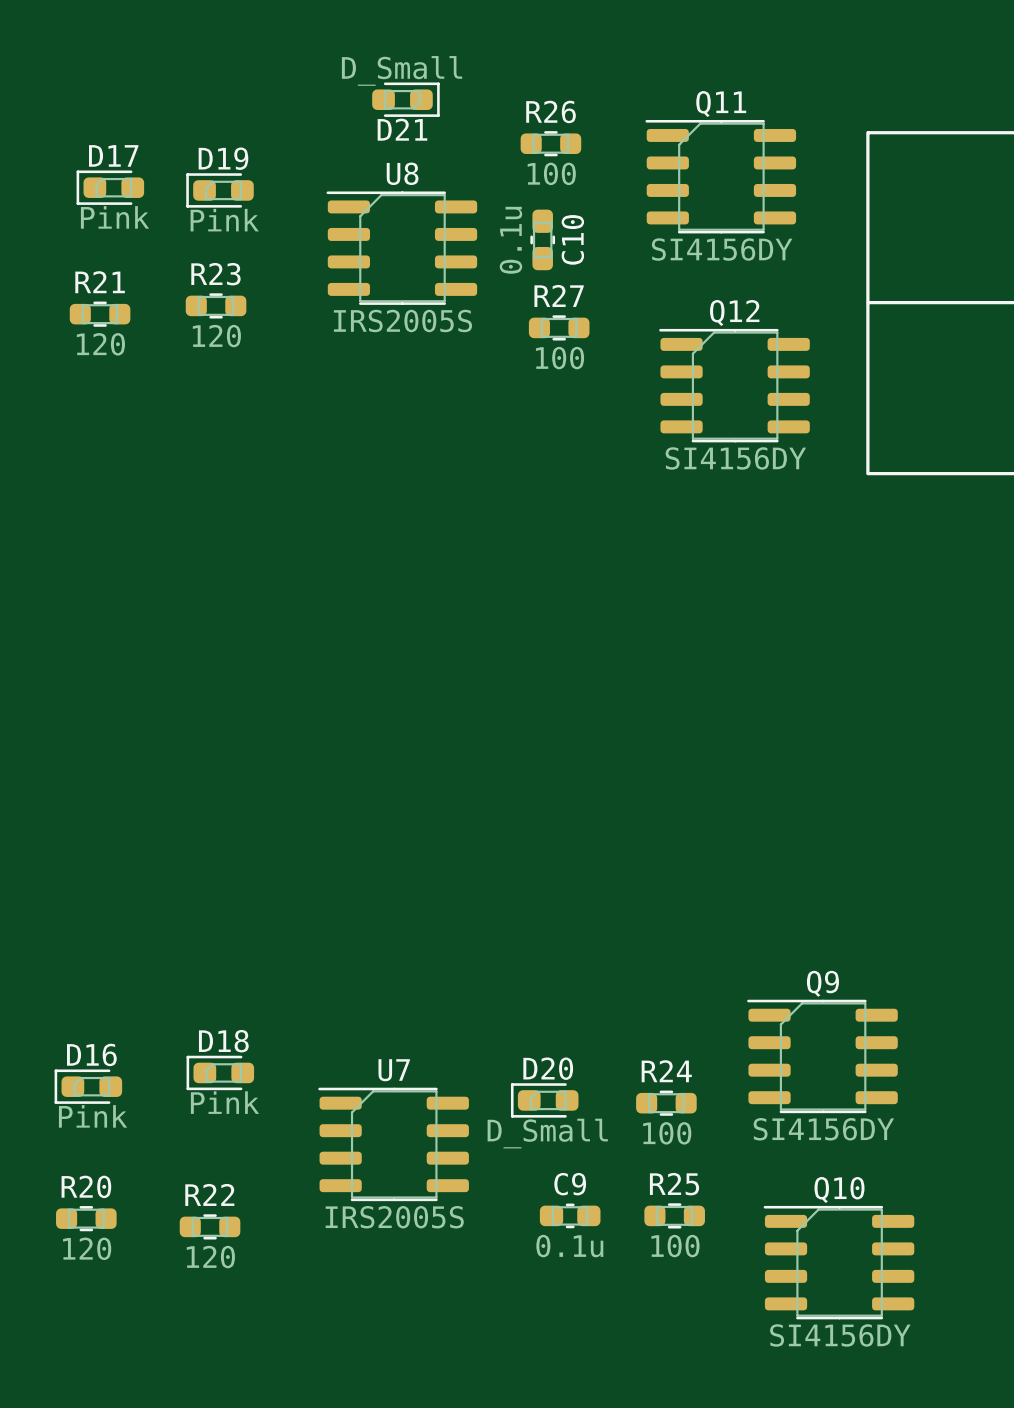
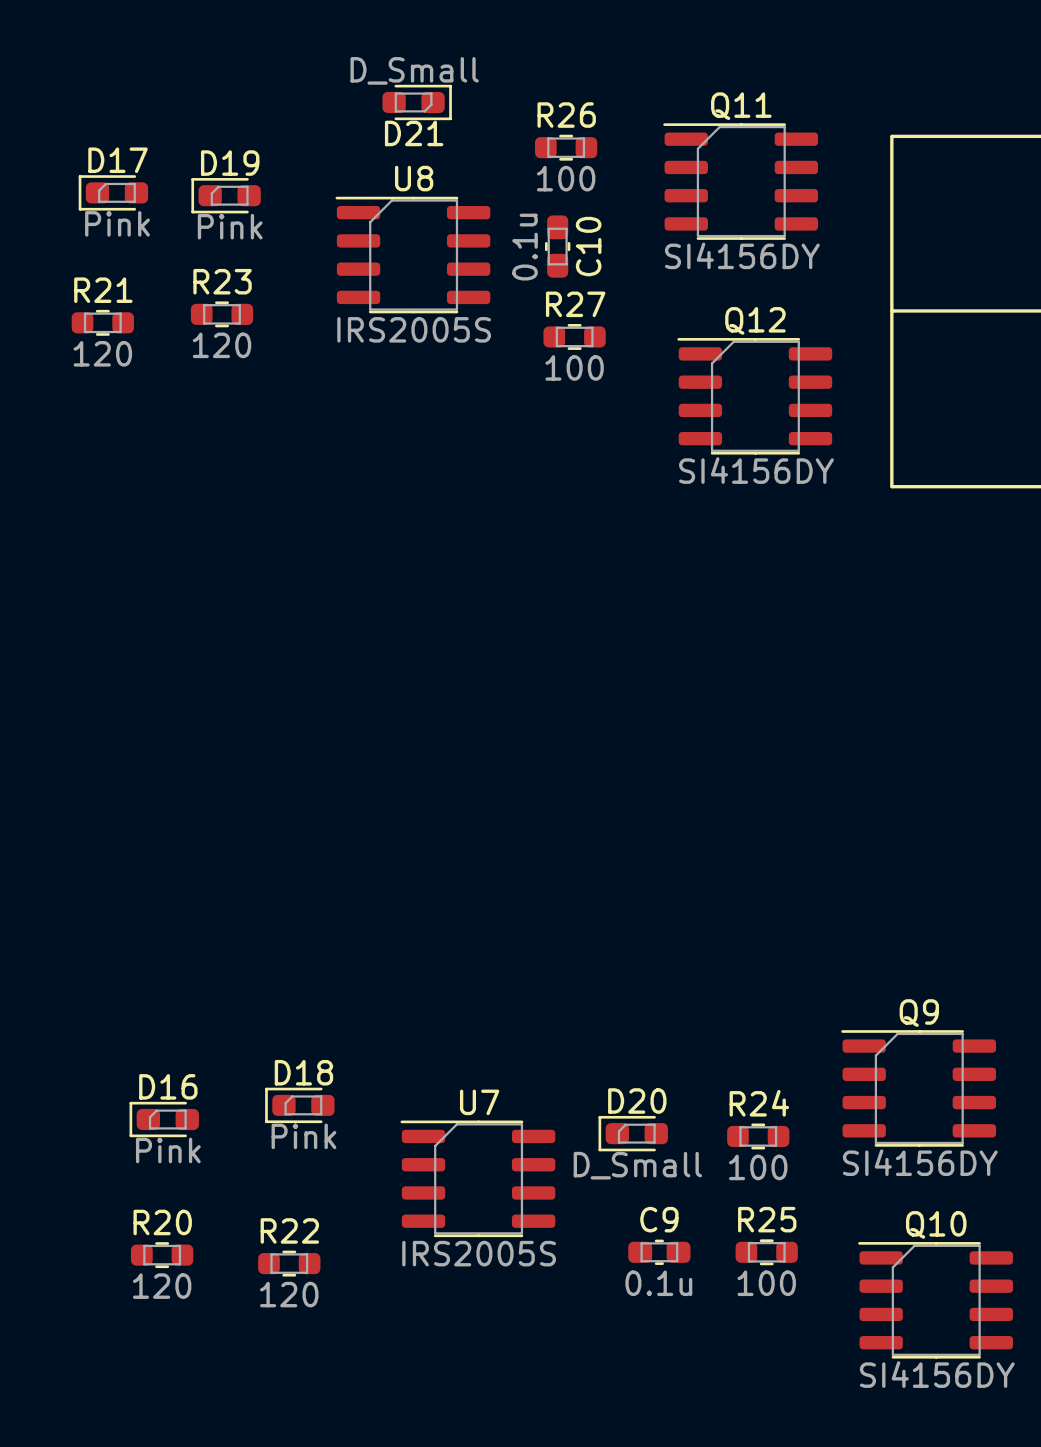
Q9 position: (822, 1056) -> (918, 1088)
D18 position: (220, 1072) -> (299, 1105)
D16 position: (88, 1086) -> (164, 1119)
D20 position: (544, 1100) -> (633, 1133)
R24 position: (666, 1103) -> (758, 1136)
U7 position: (393, 1144) -> (477, 1178)
C9 position: (570, 1215) -> (659, 1252)
R25 position: (674, 1215) -> (766, 1252)
R20 position: (86, 1218) -> (162, 1255)
R22 position: (210, 1226) -> (289, 1263)
Q10 position: (838, 1262) -> (935, 1300)

